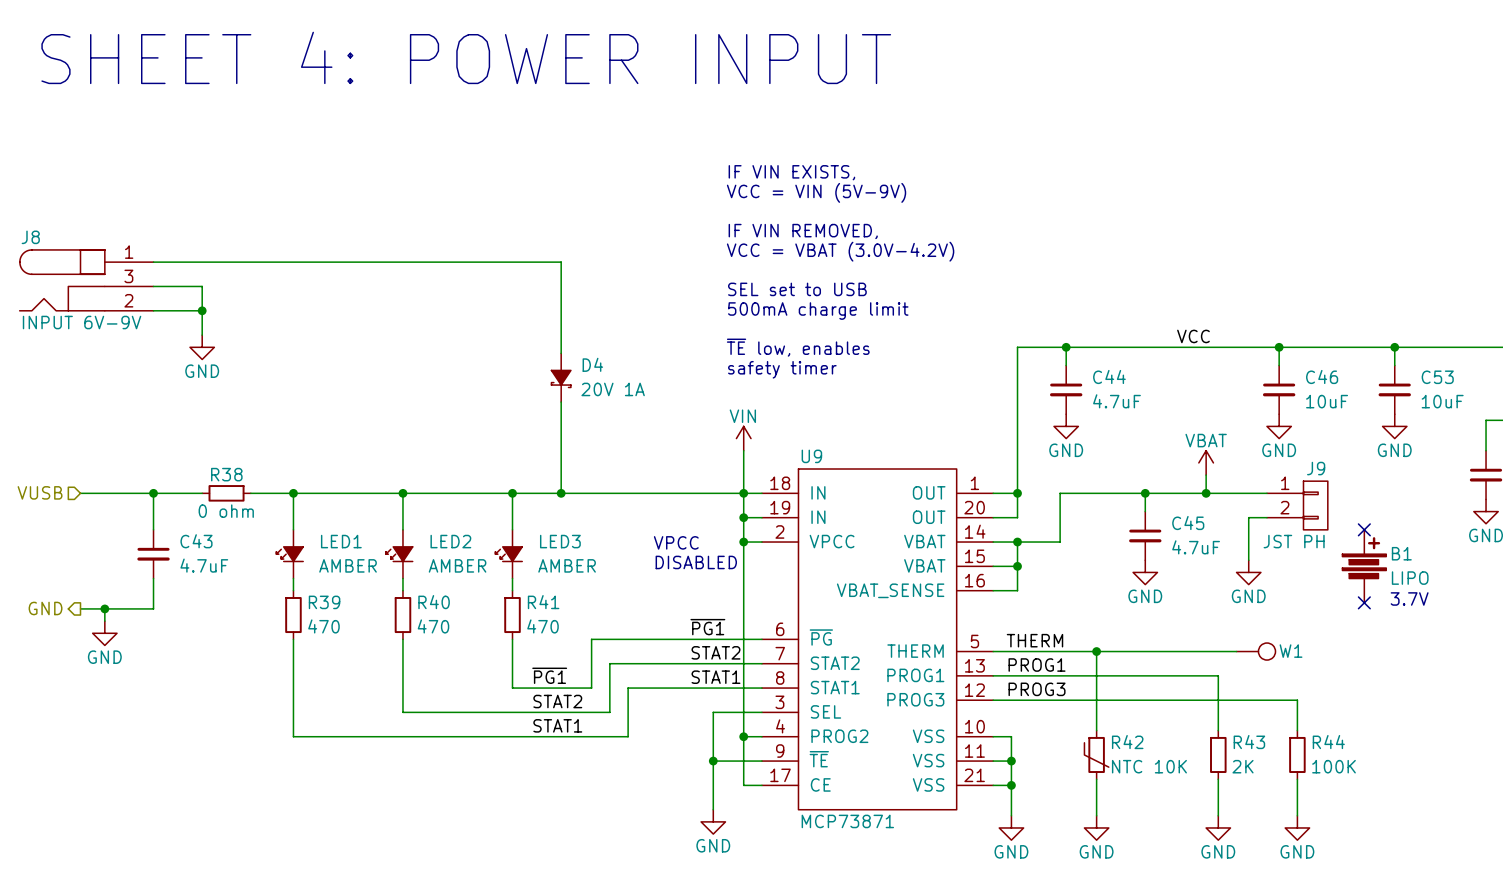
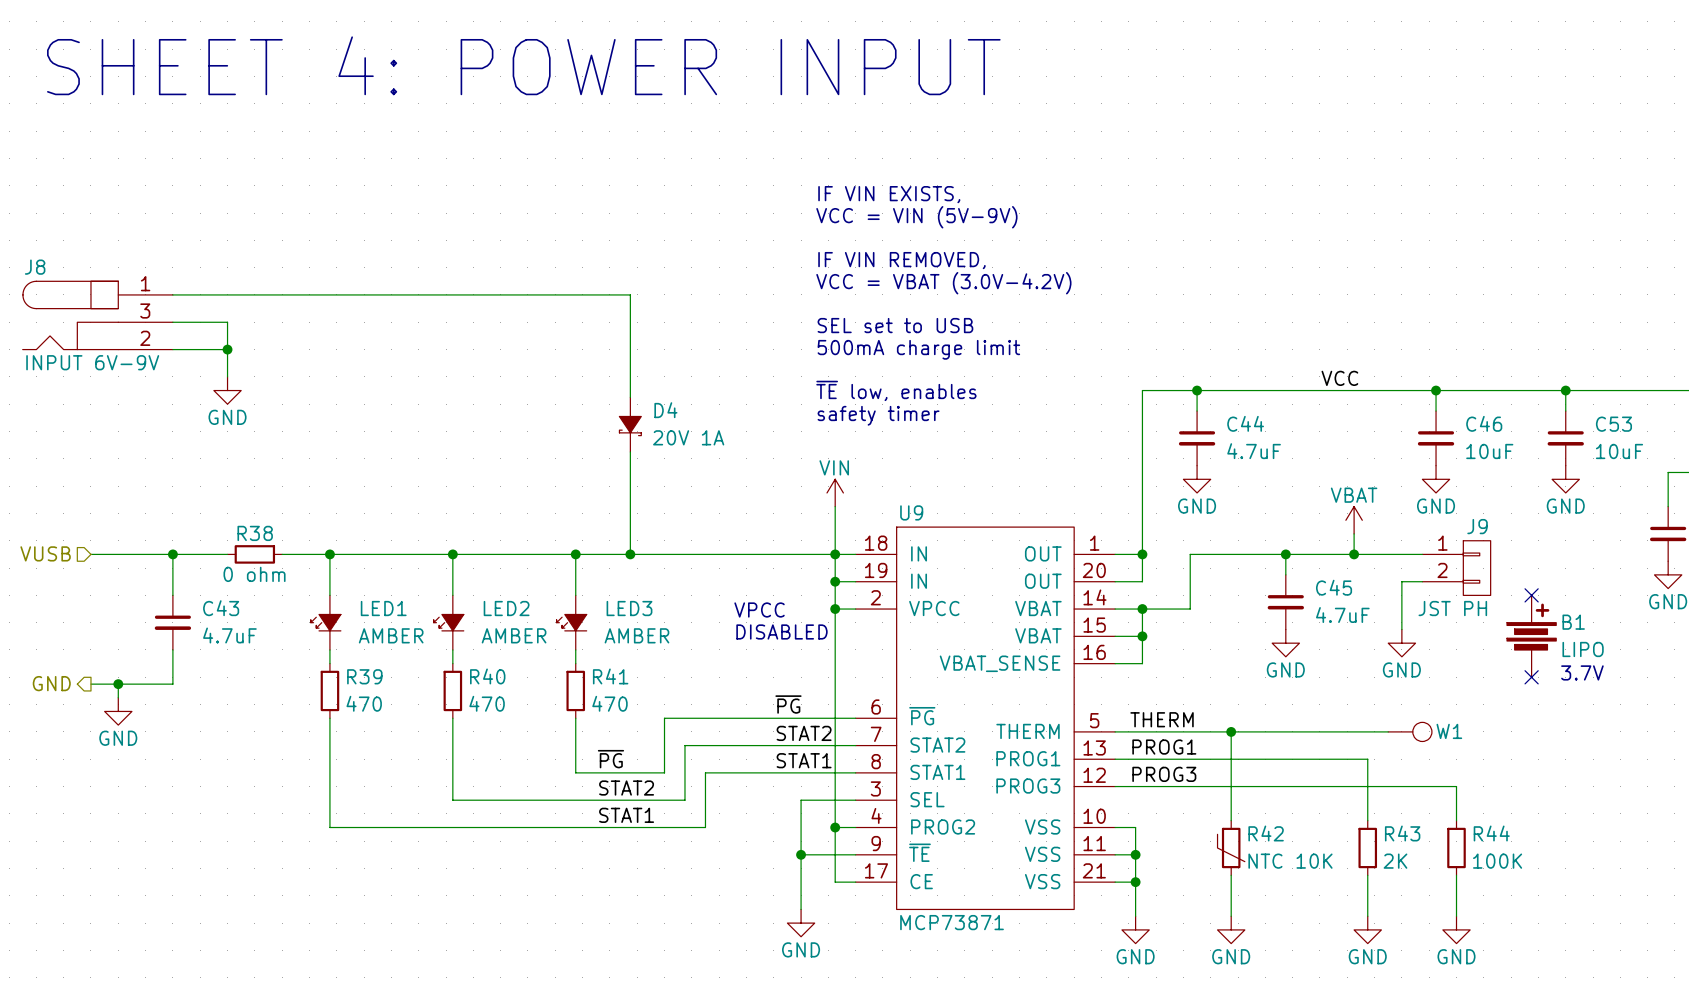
label: ~{PG1} (707, 627) -> ~{PG} (788, 704)
label: ~{PG1} (549, 675) -> ~{PG} (610, 759)

